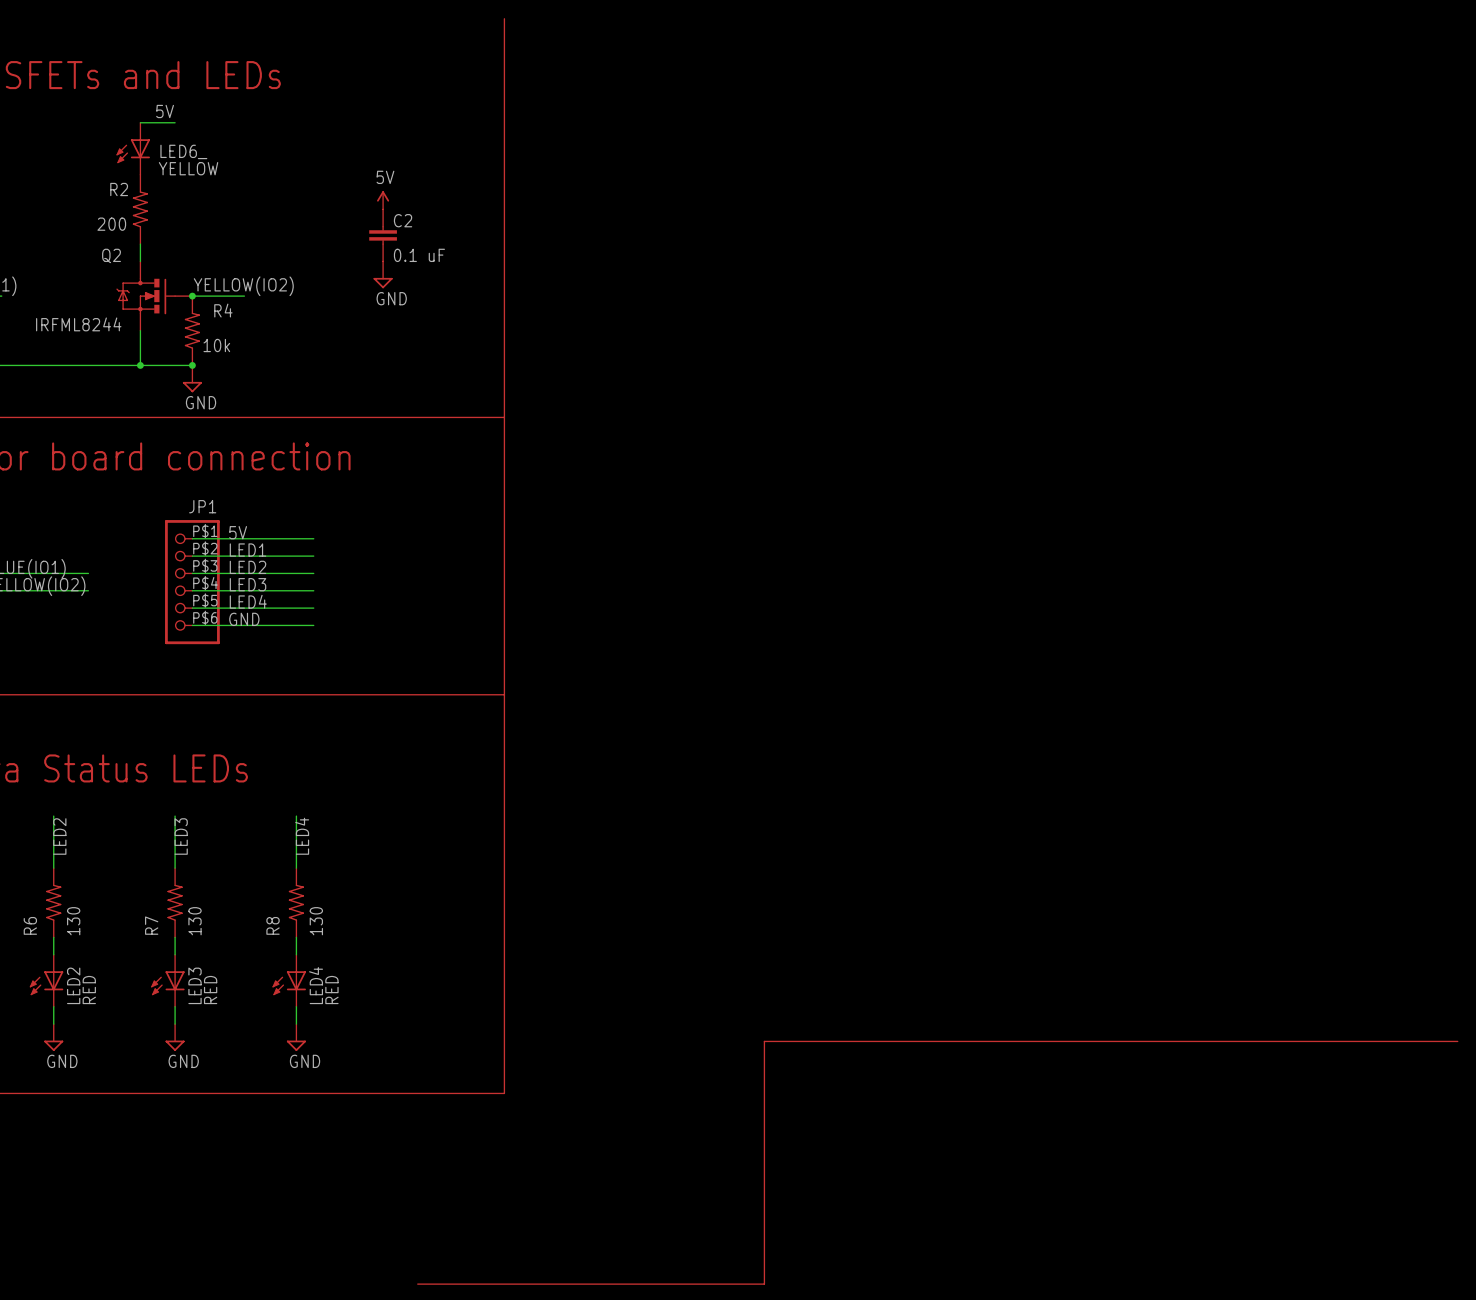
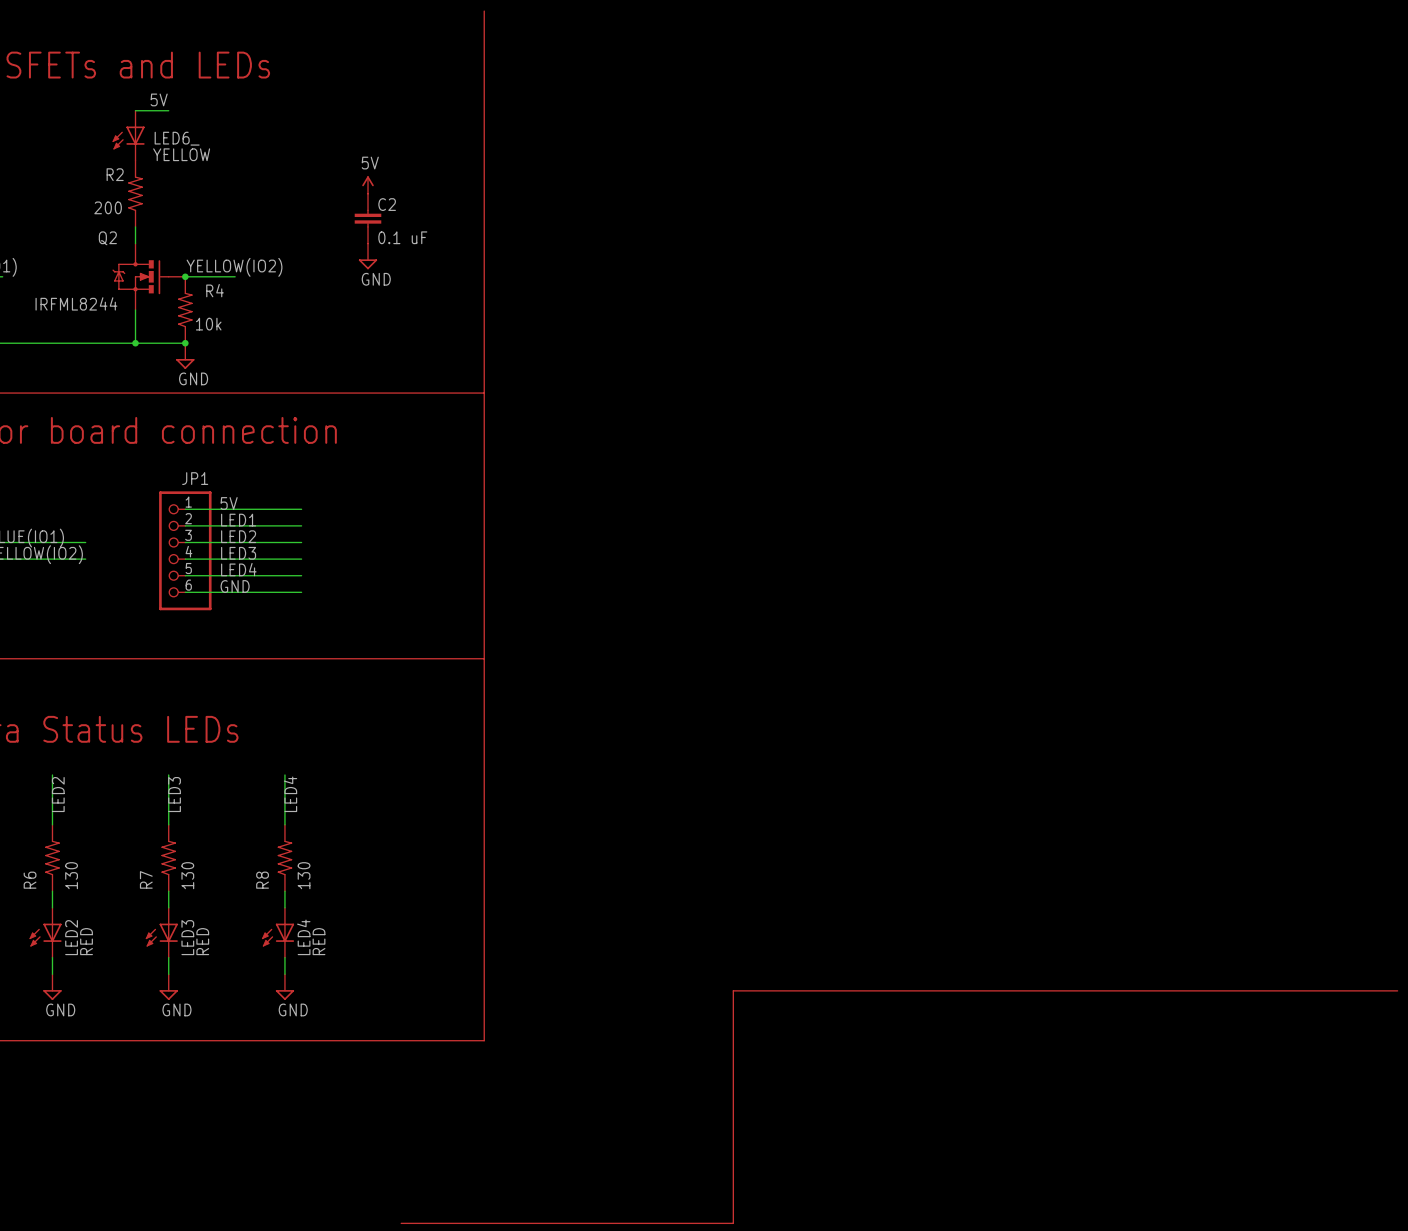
JP1 pin number: P$1 (205, 531) -> 1 (188, 502)
JP1 pin number: P$2 (205, 548) -> 2 (188, 518)
JP1 pin number: P$3 (205, 565) -> 3 (188, 535)
JP1 pin number: P$4 (205, 583) -> 4 (188, 551)
JP1 pin number: P$5 (205, 600) -> 5 (188, 568)
JP1 pin number: P$6 (205, 617) -> 6 (188, 585)

